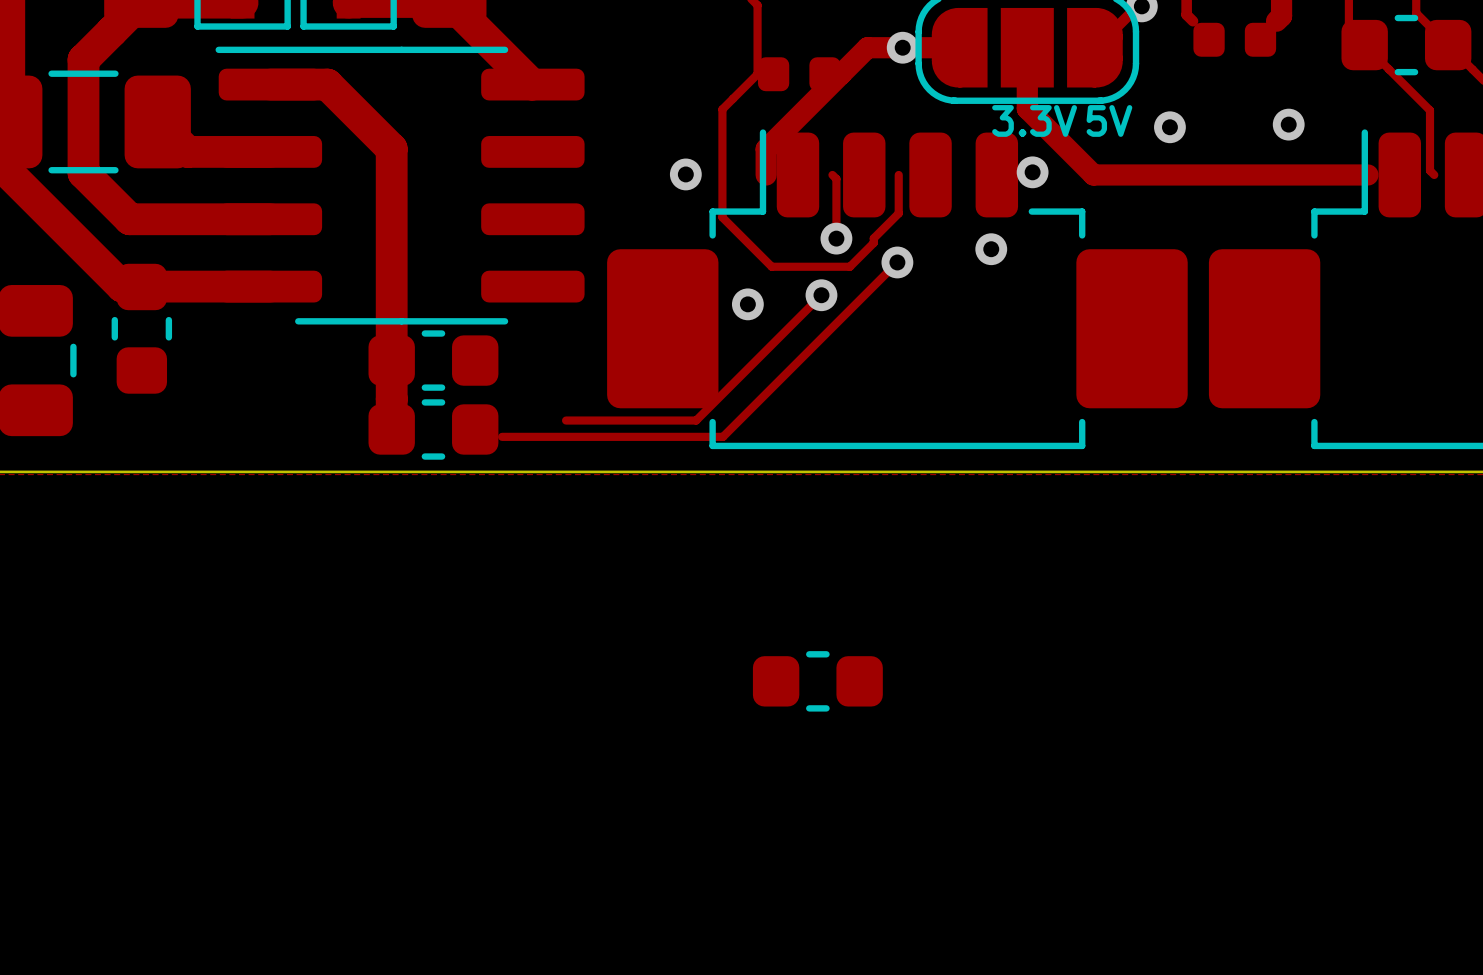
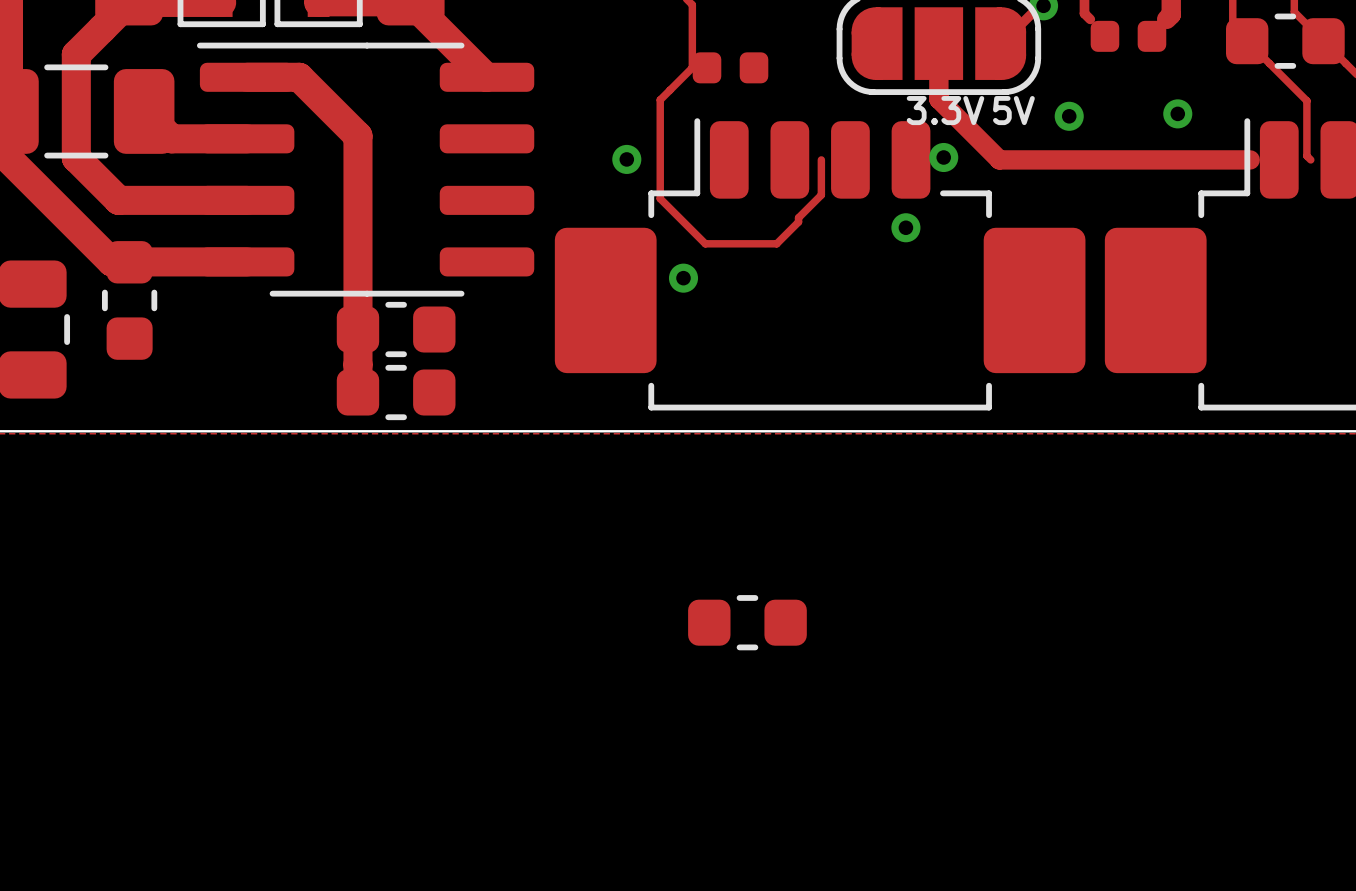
via: (902, 47) -> none
track: (958, 47) (867, 47) (766, 149) (766, 174) -> none
track: (832, 174) (836, 178) (836, 238) -> none
via: (836, 238) -> none
track: (897, 262) (723, 436) (502, 436) -> none
via: (897, 262) -> none
track: (821, 295) (696, 420) (566, 420) -> none
via: (821, 295) -> none

